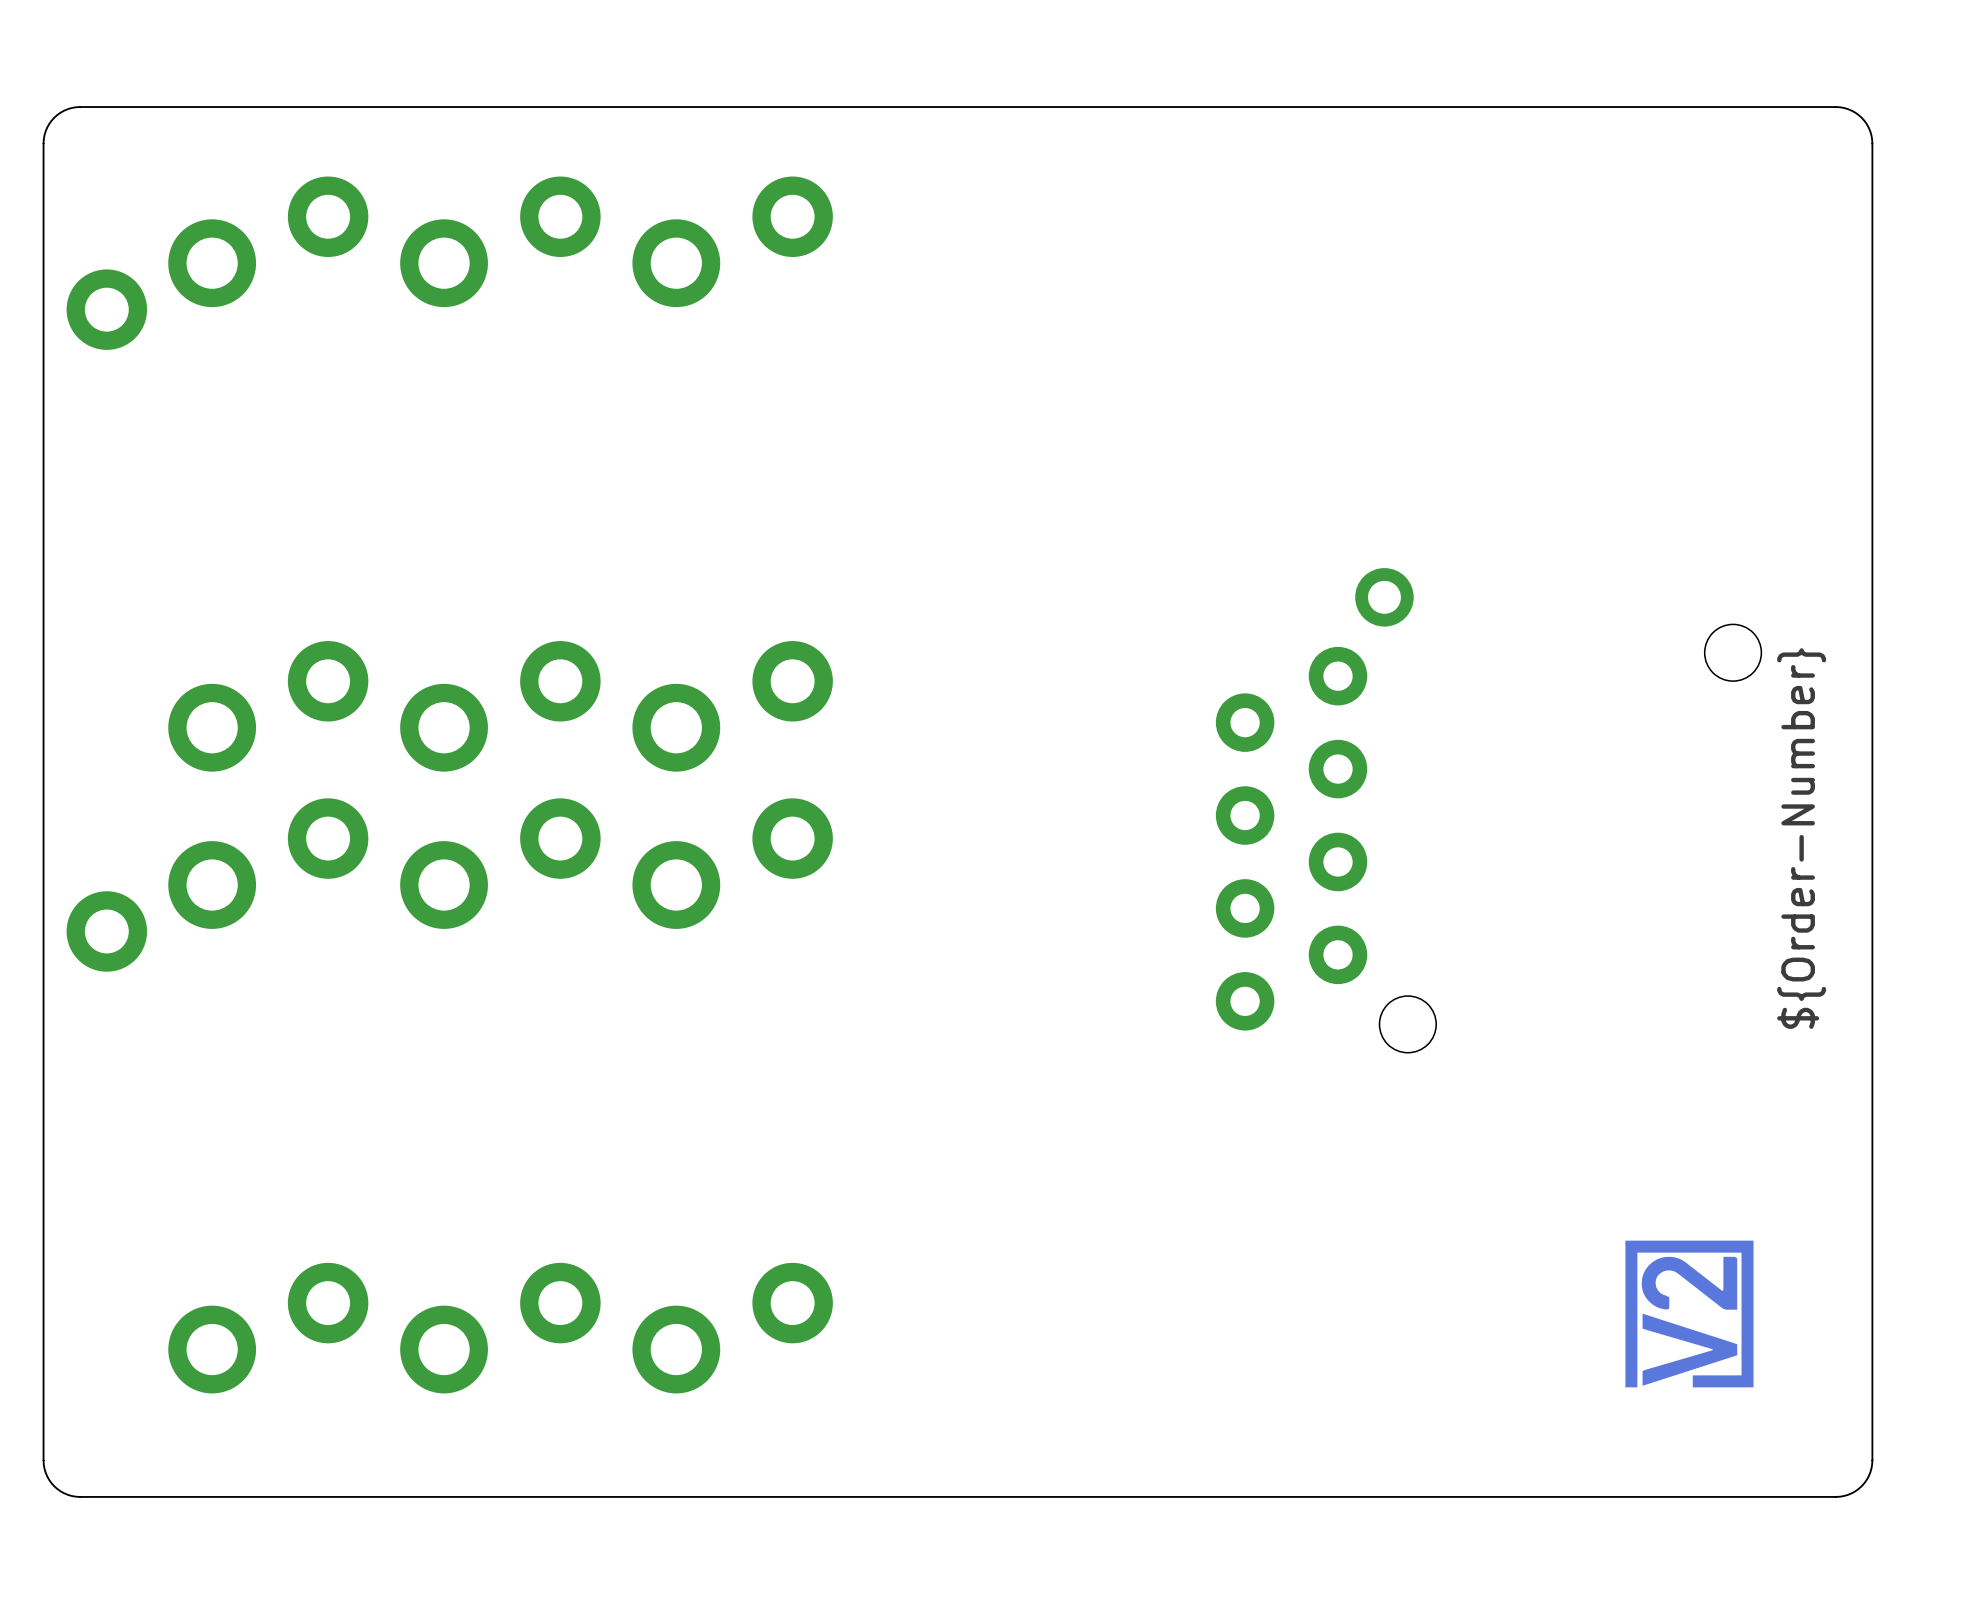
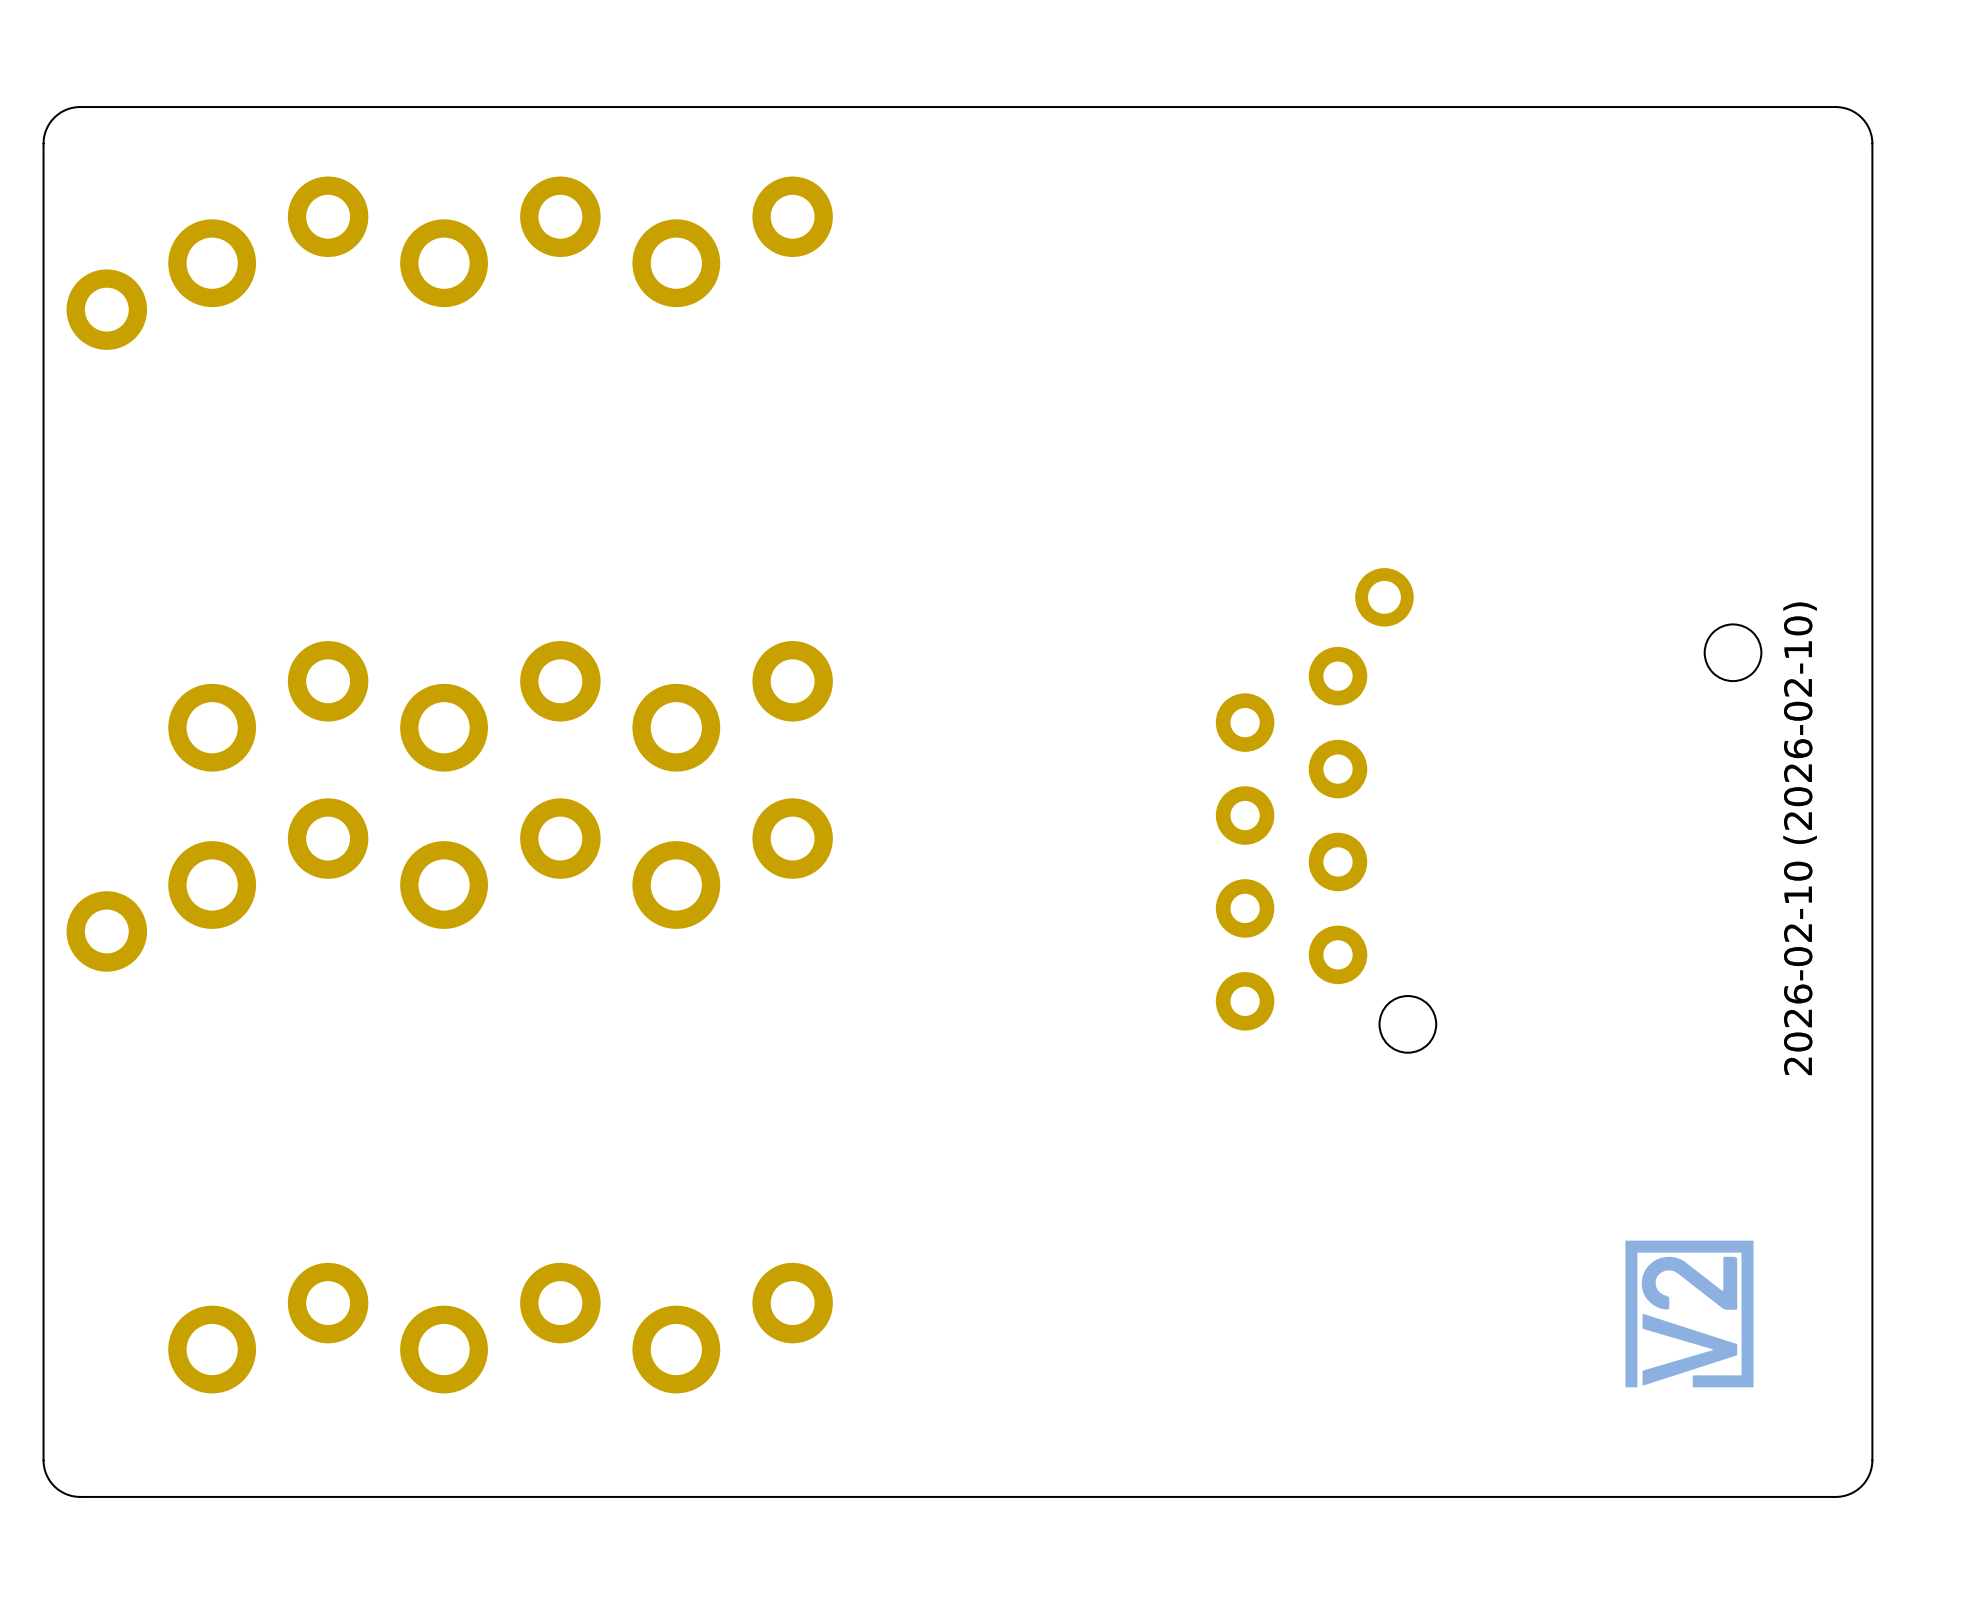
drawing shape: [1777, 648, 1827, 1029] -> [1783, 602, 1817, 1076]

